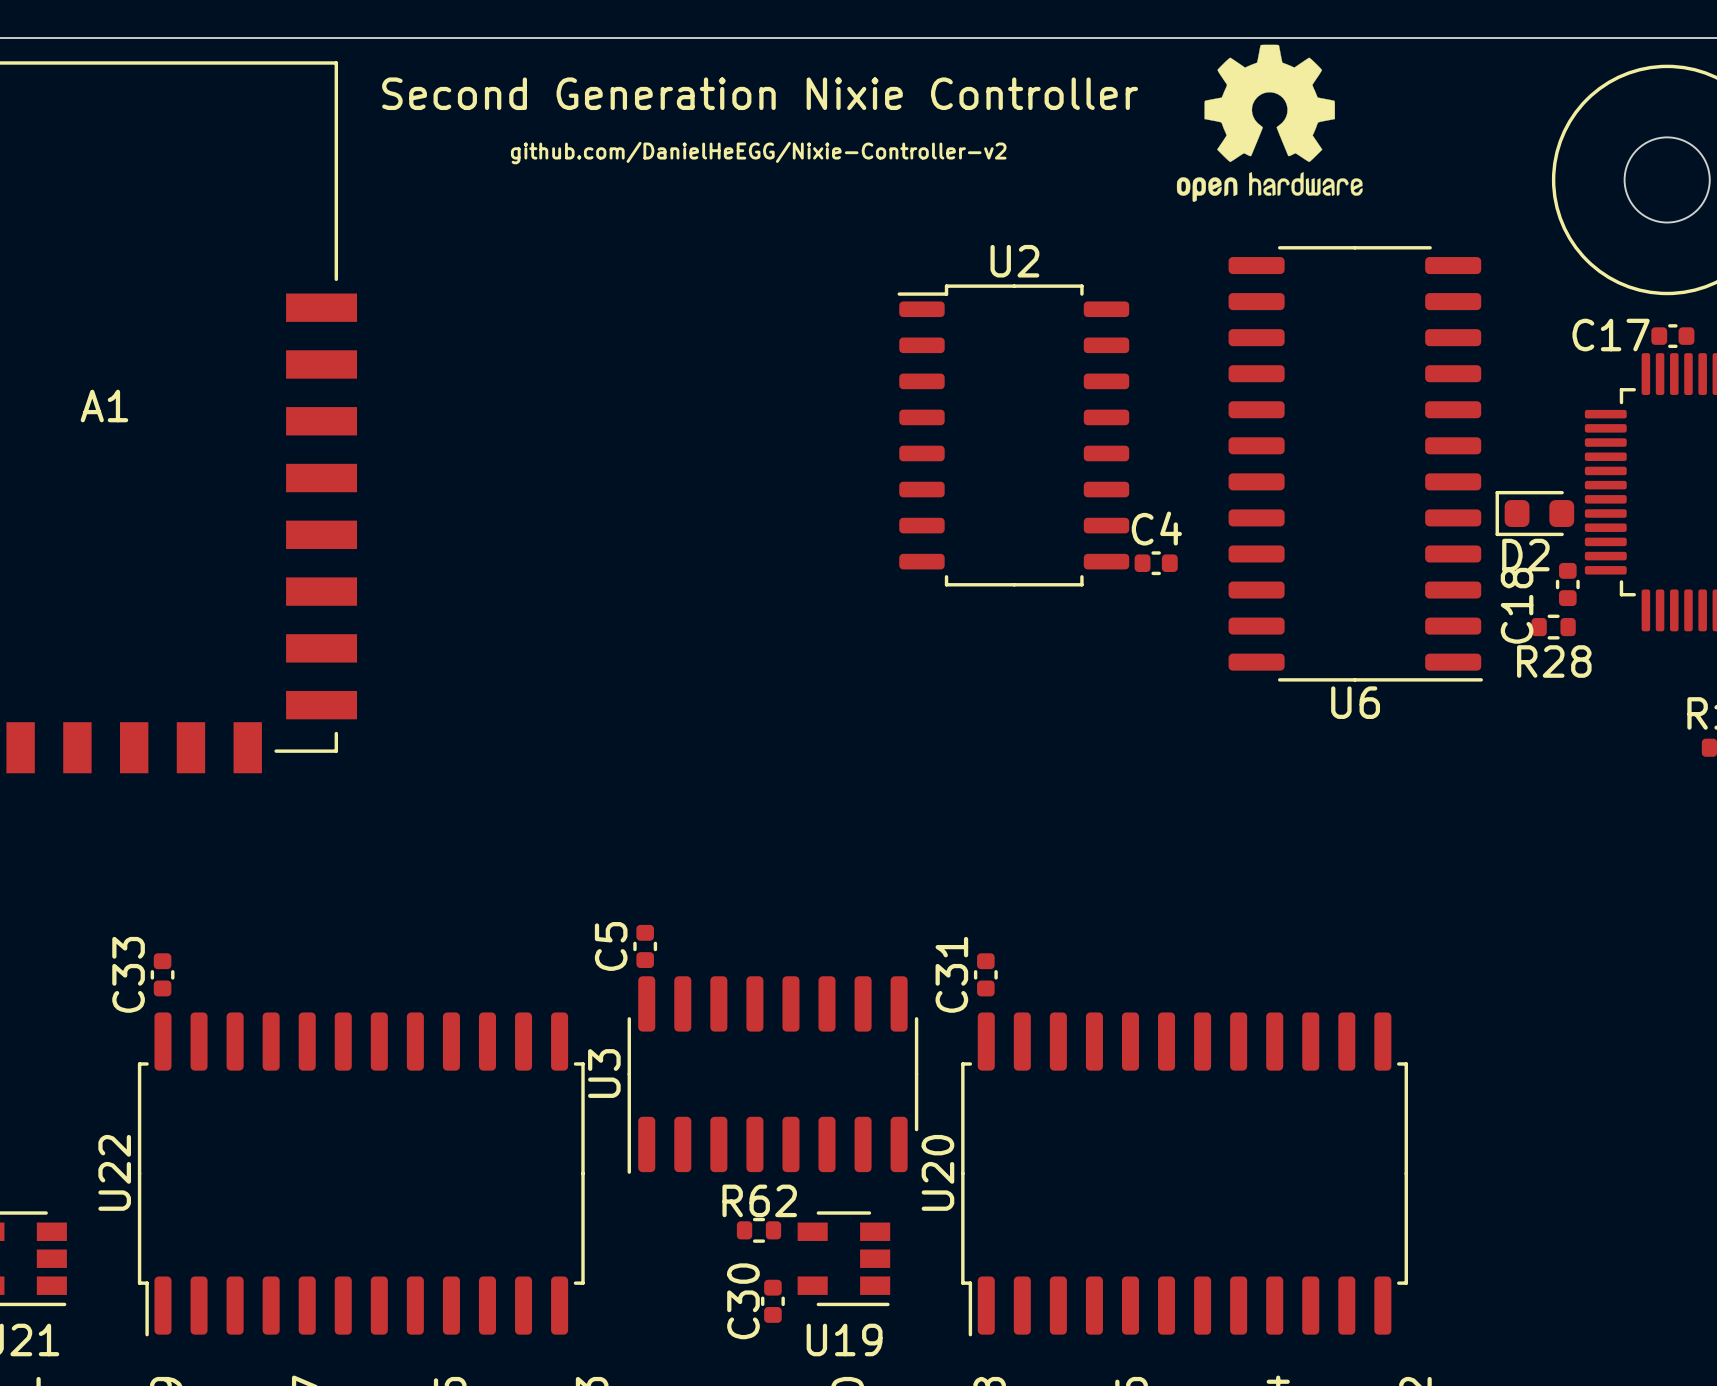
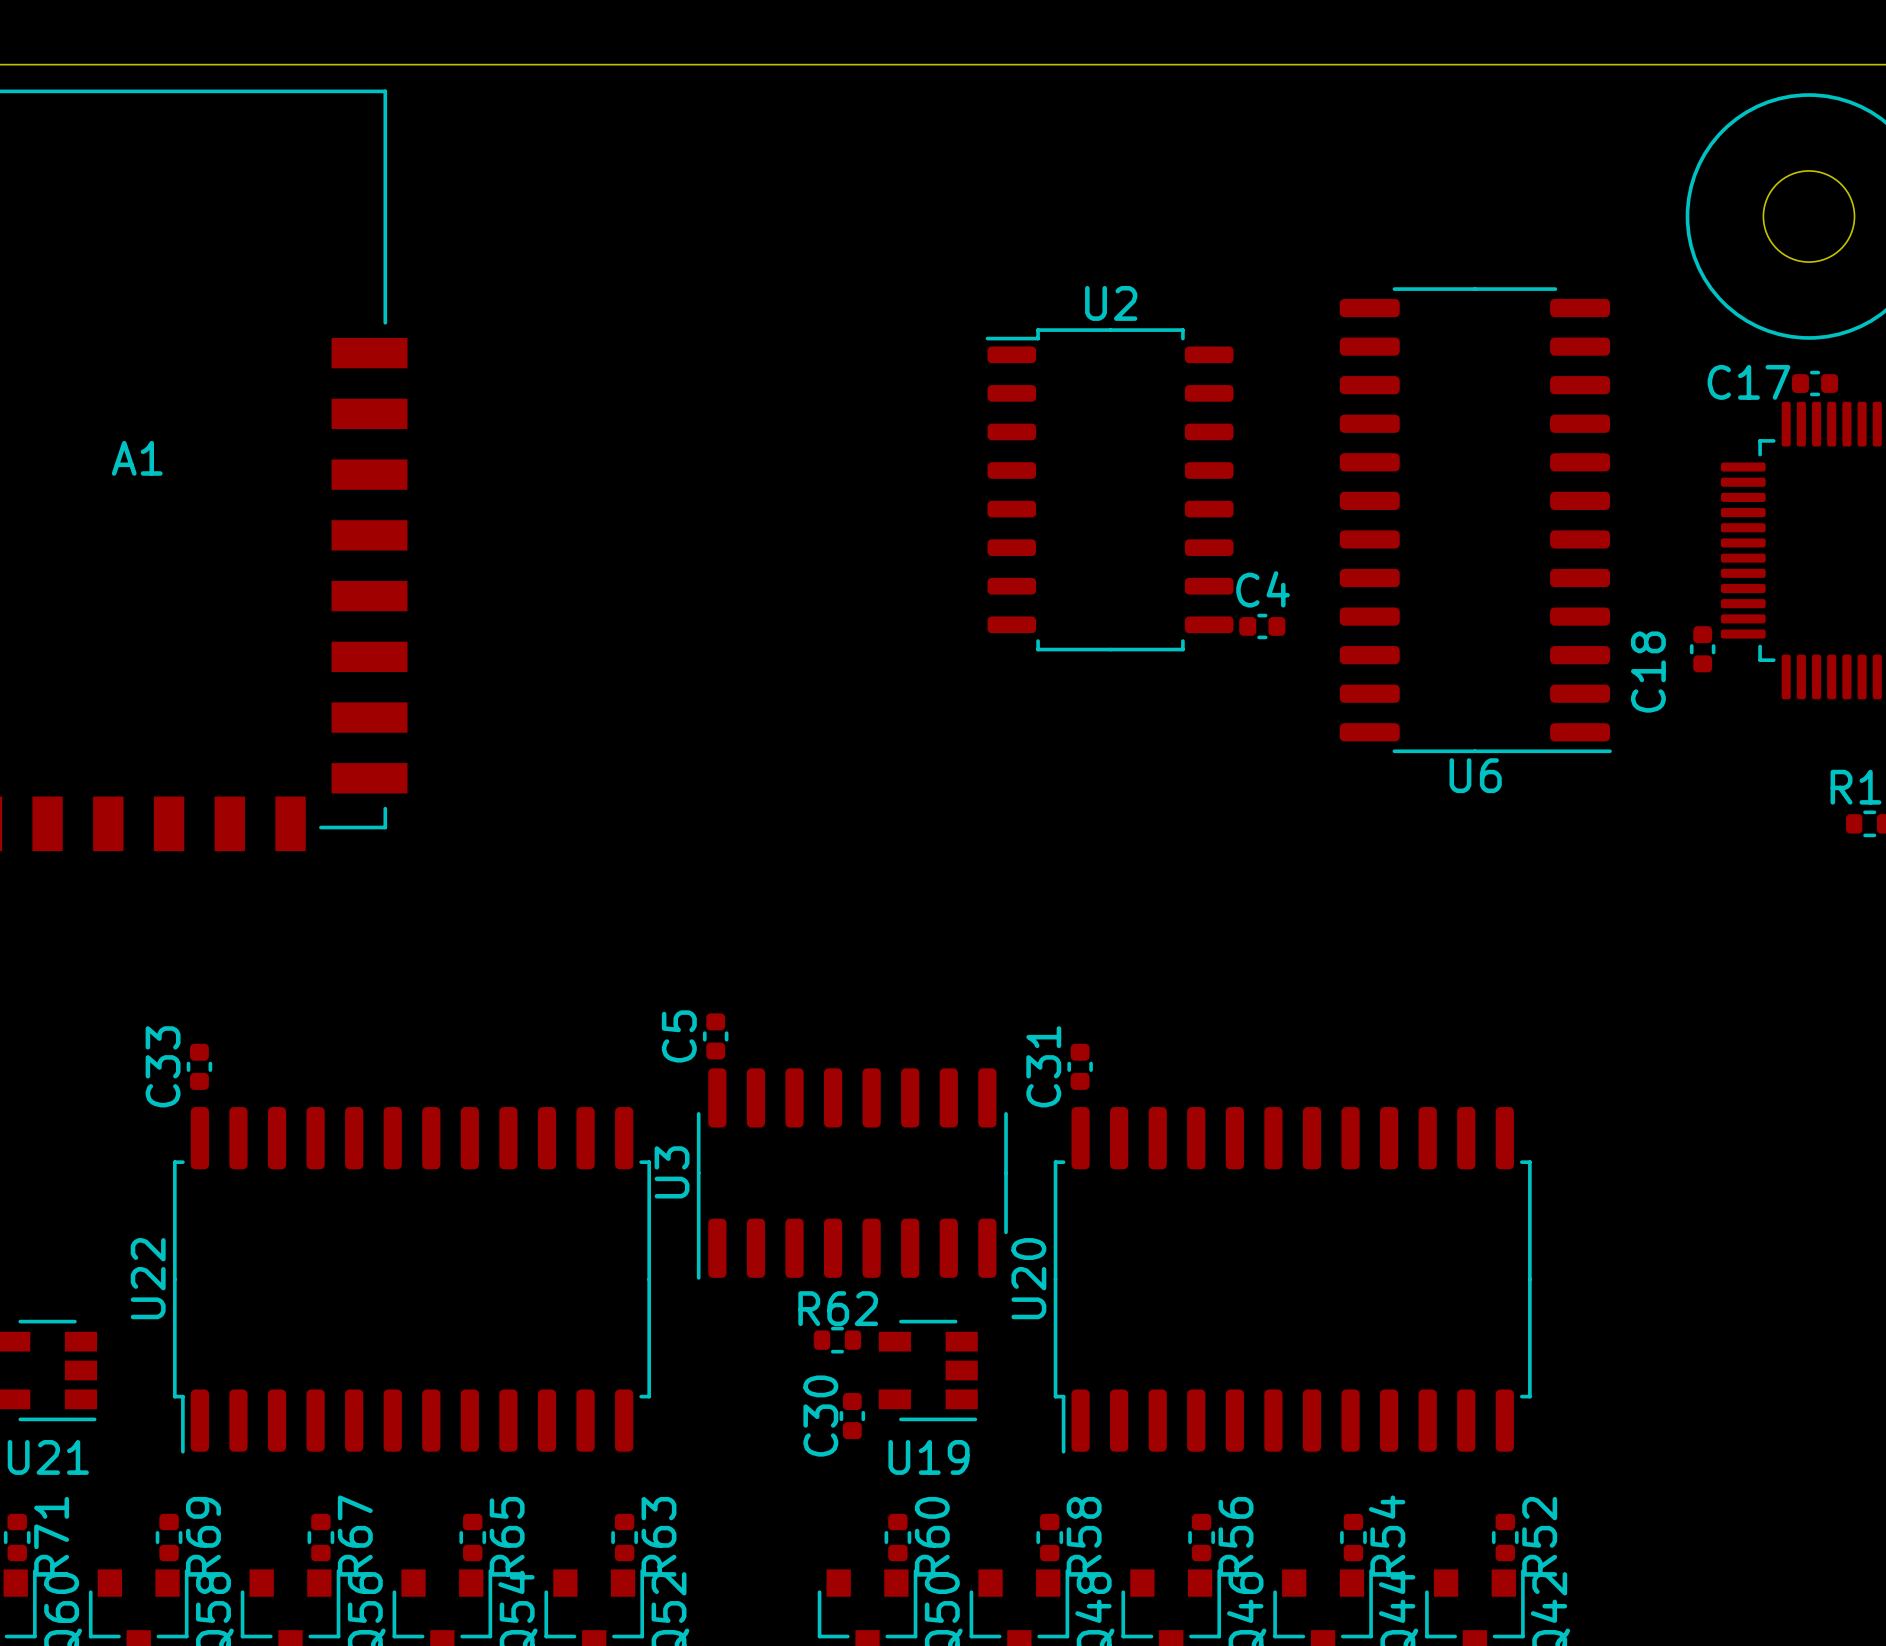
drawing: [1176, 44, 1363, 202] -> none
text: Second Generation Nixie Controller (760, 93) -> none
text: github.com/DanielHeEGG/Nixie-Controller-v2 (758, 153) -> none
D2: (1534, 513) -> none
R28: (1553, 627) -> none

